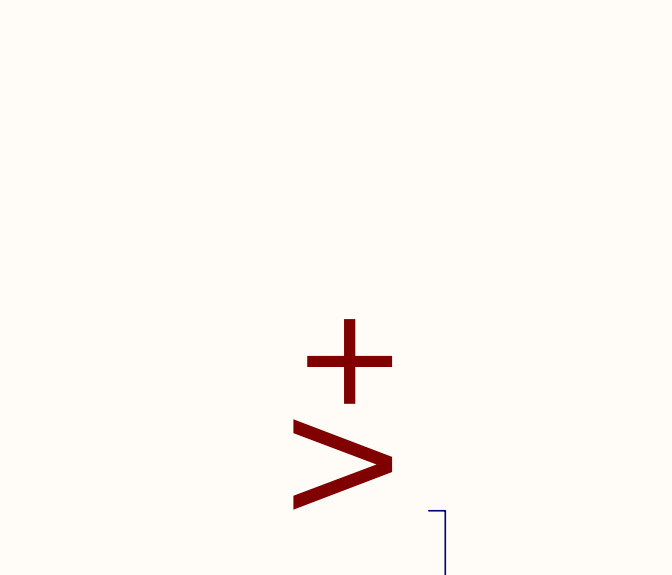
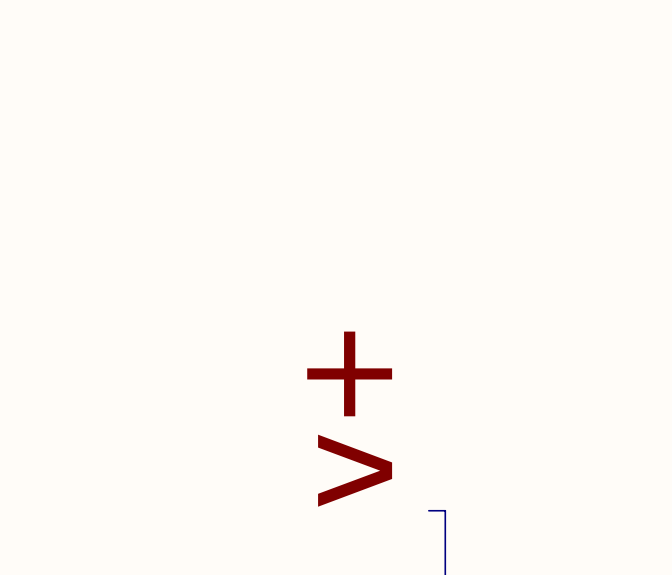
label: V+ (342, 414) -> v+ (349, 419)

